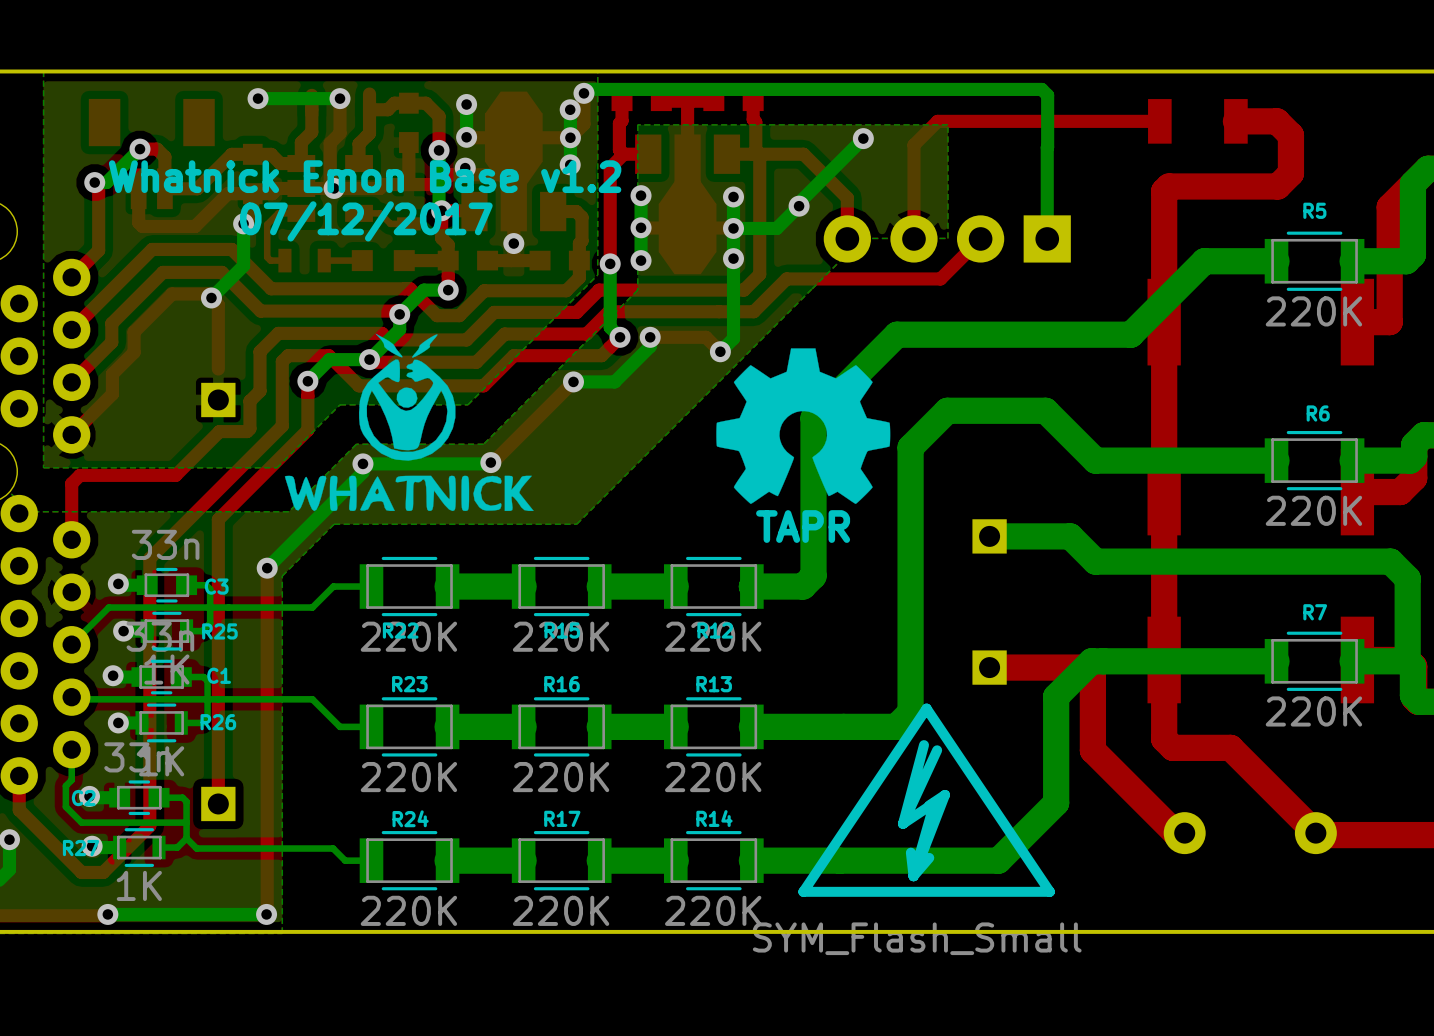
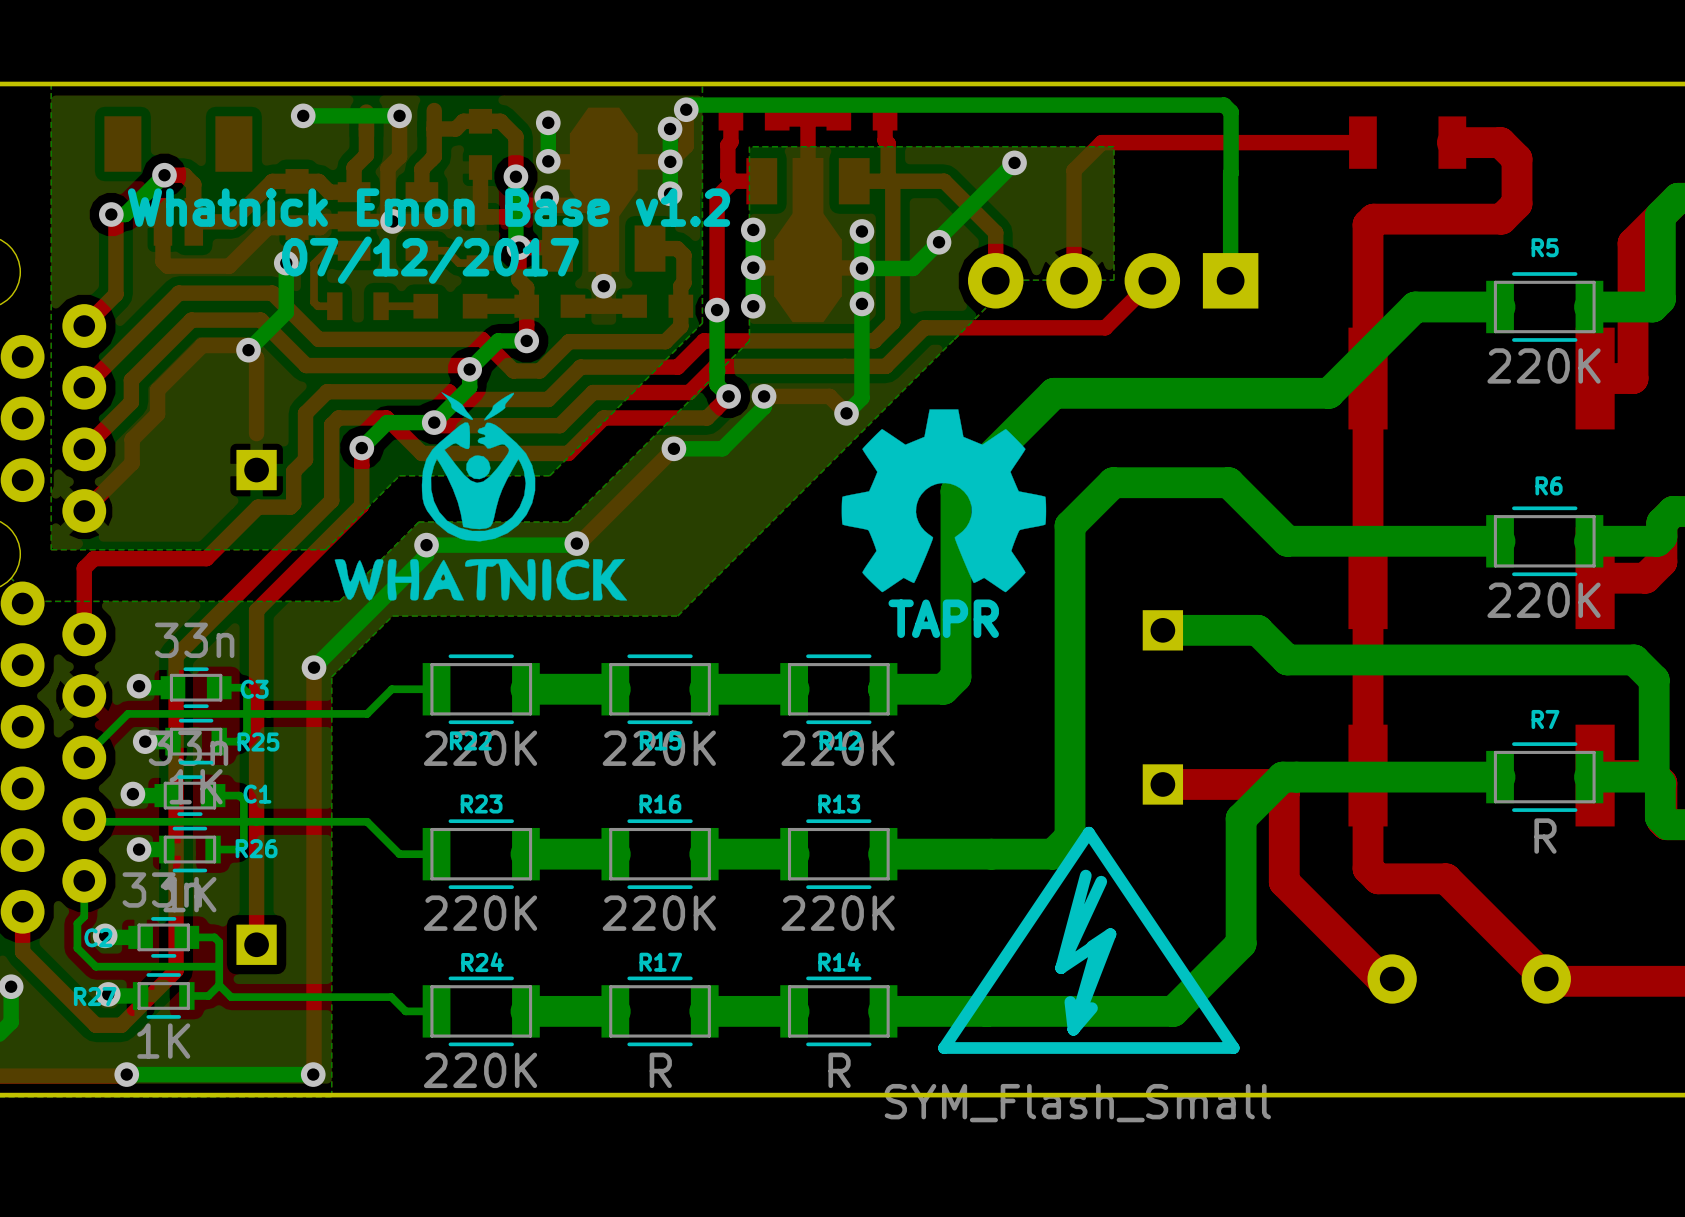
R7 value: 220K (1313, 711) -> R (1545, 836)
R17 value: 220K (561, 910) -> R (660, 1070)
R14 value: 220K (713, 910) -> R (839, 1070)

